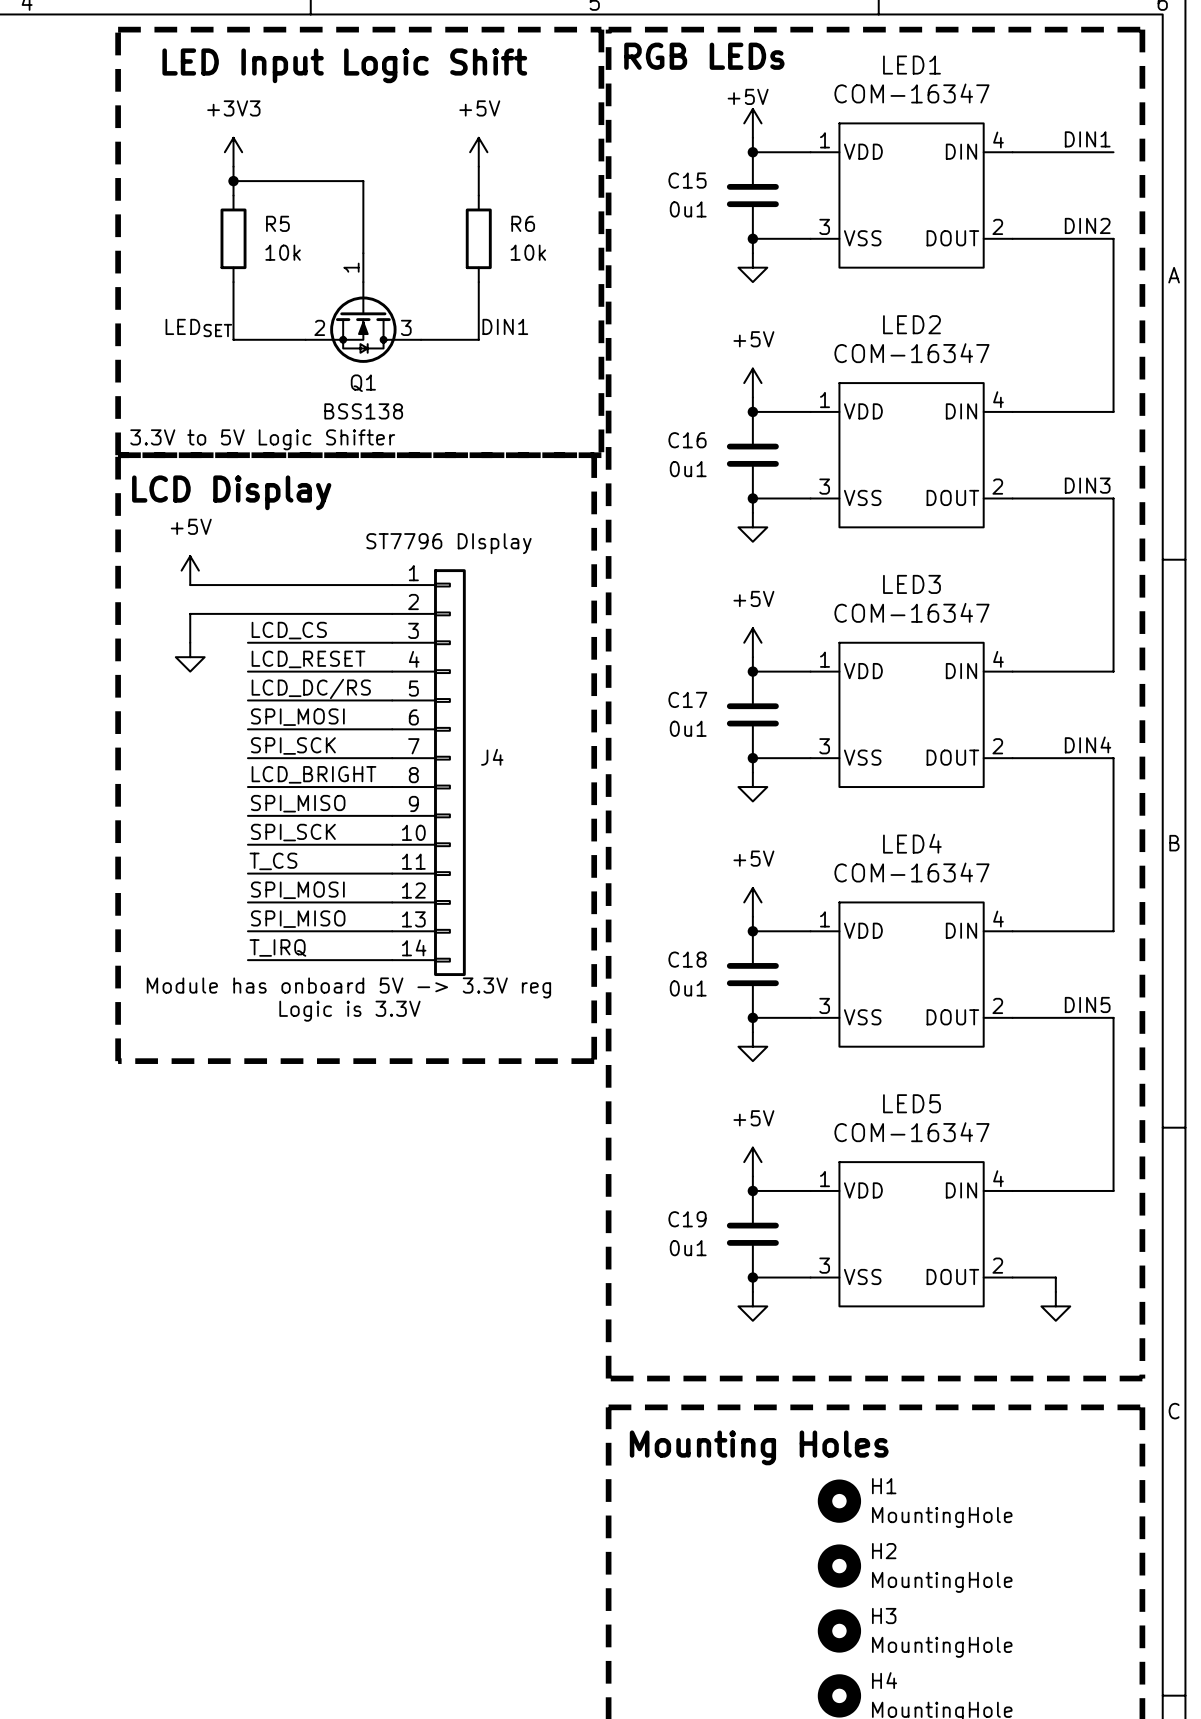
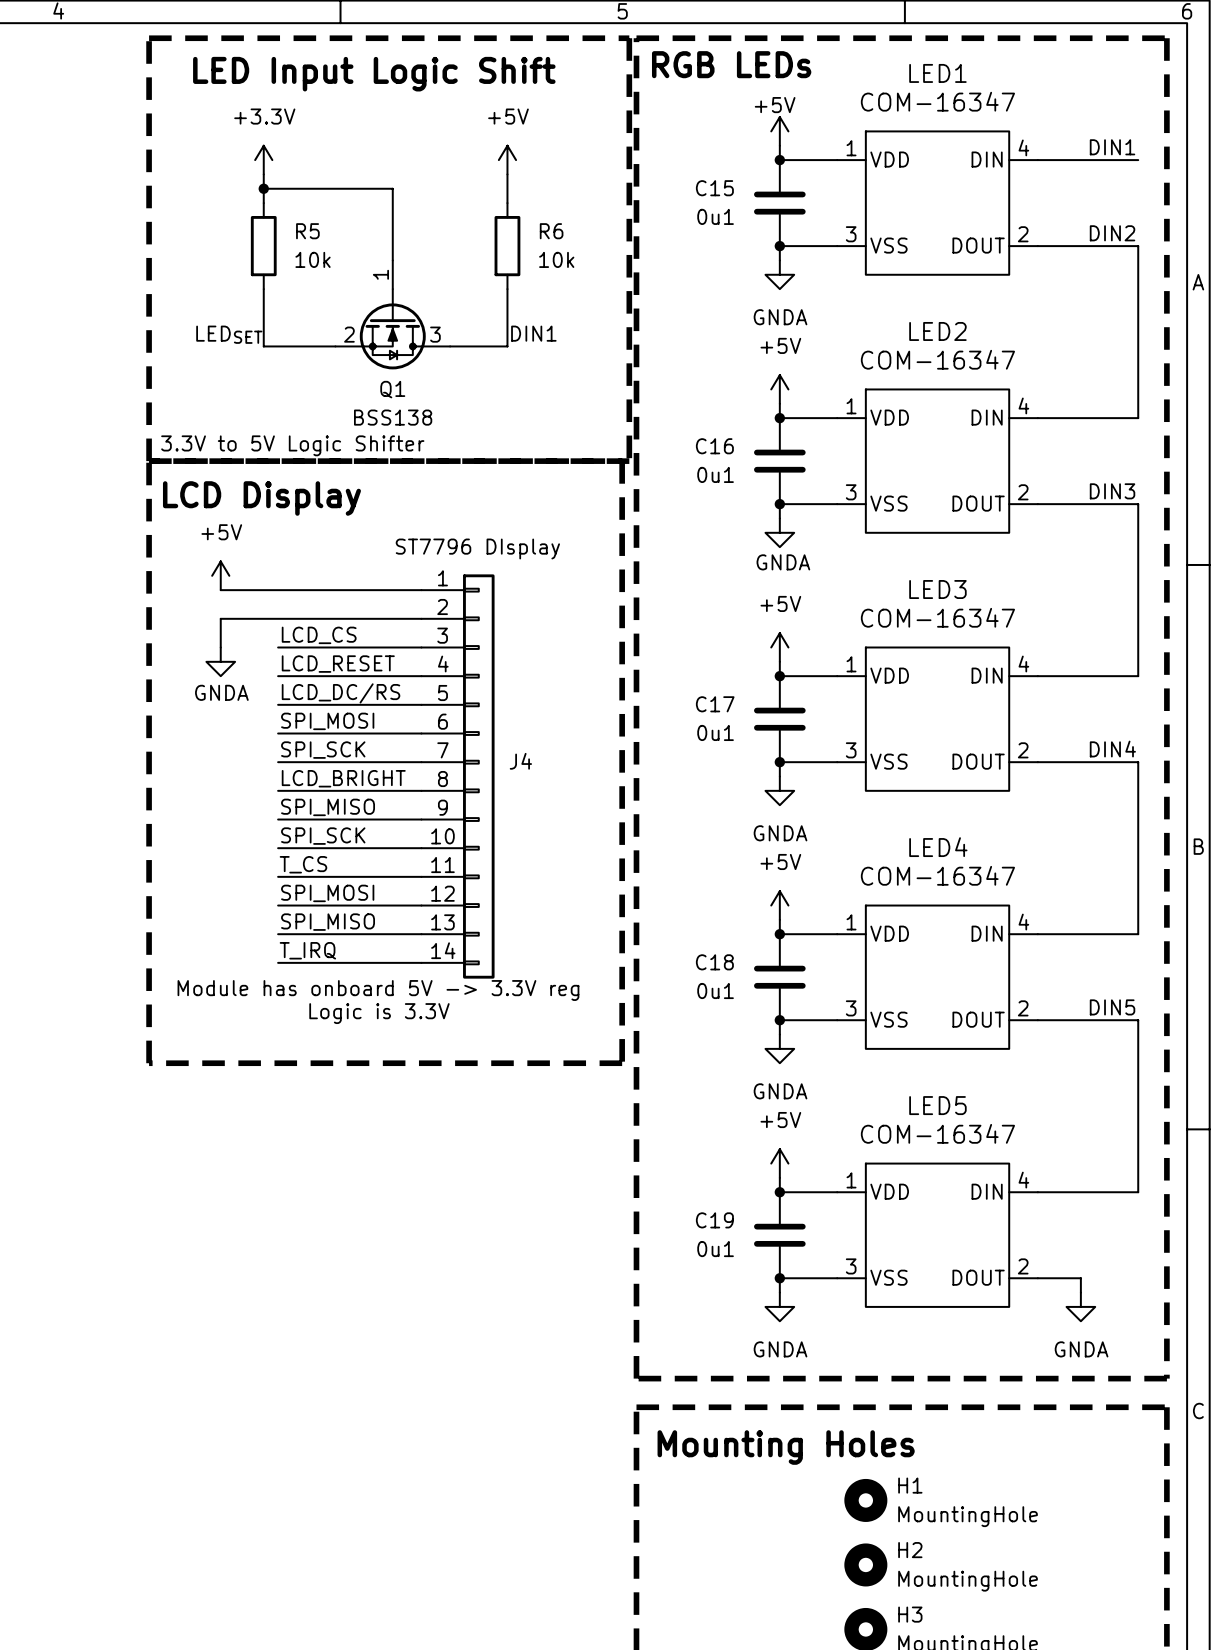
power symbol: +3V3 (233, 152) -> +3.3V (263, 160)
power symbol text: none -> GNDA (780, 317)
power symbol text: none -> GNDA (783, 562)
power symbol text: none -> GNDA (221, 692)
power symbol text: none -> GNDA (780, 833)
power symbol text: none -> GNDA (780, 1091)
power symbol text: none -> GNDA (780, 1349)
power symbol text: none -> GNDA (1081, 1349)

